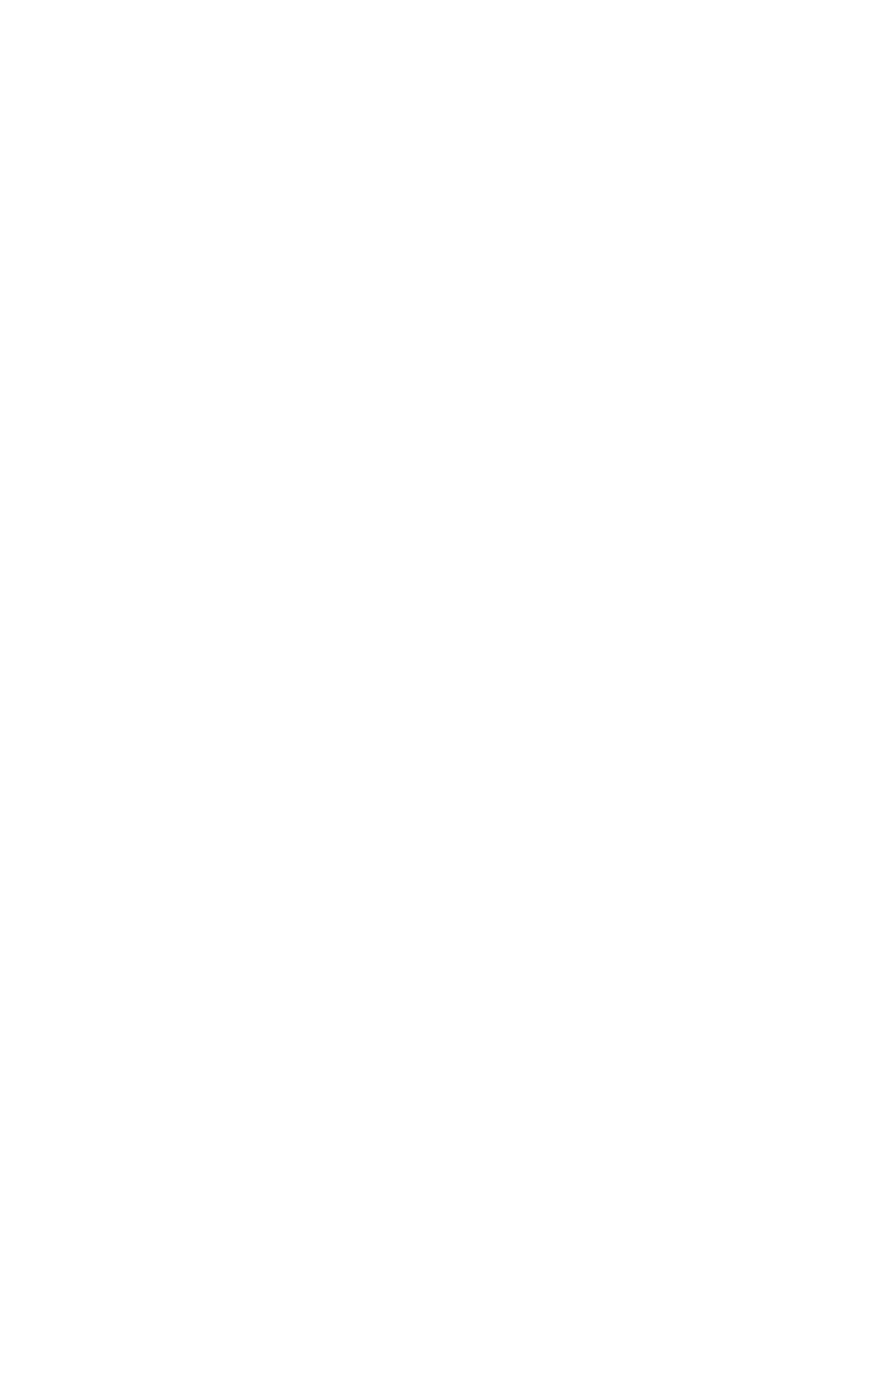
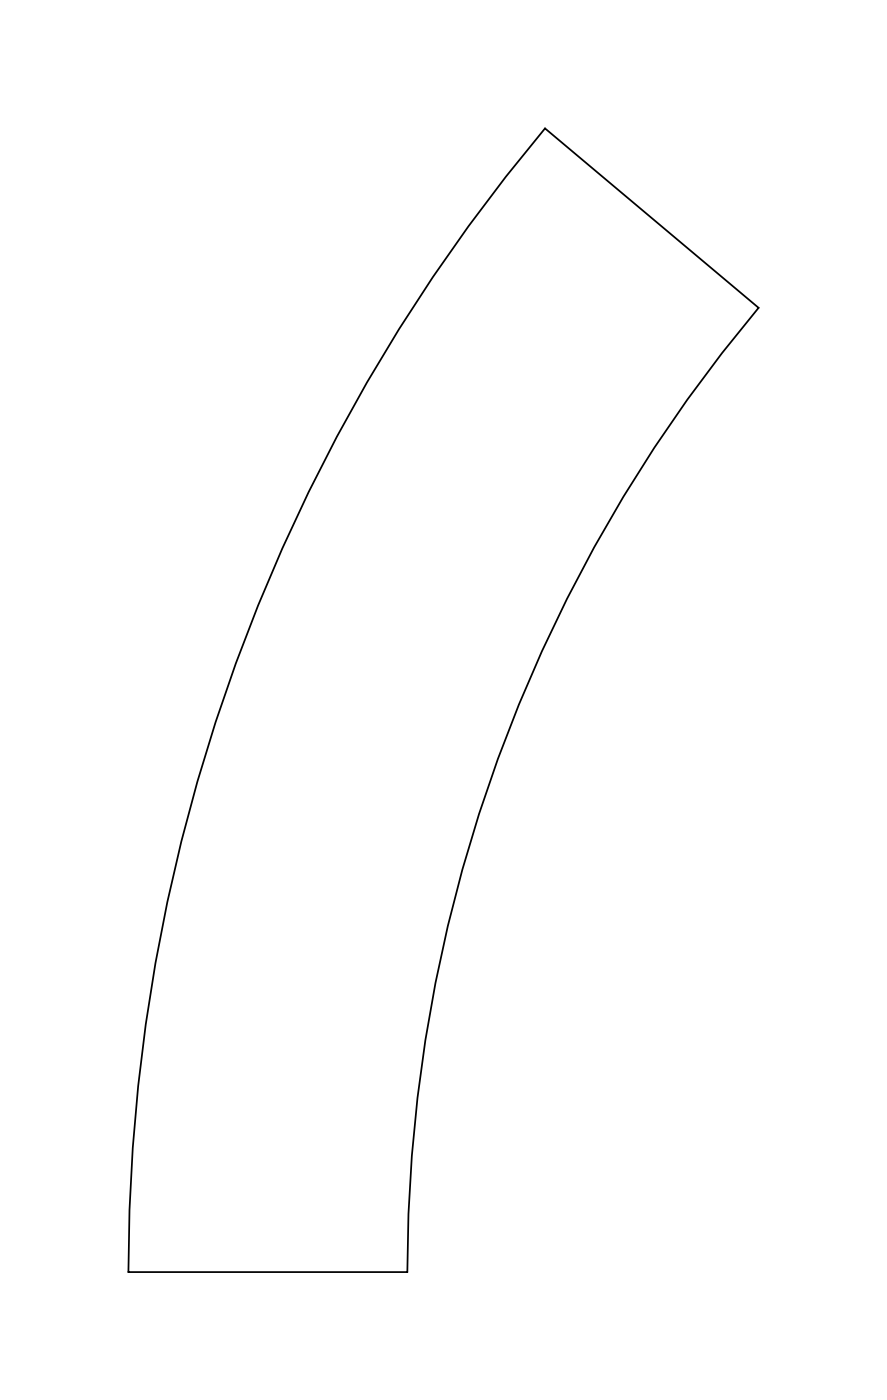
board edge: none -> (545, 128) (758, 307) (687, 399) (623, 496) (567, 598) (541, 651) (497, 758) (462, 869) (435, 982) (425, 1040) (411, 1155) (407, 1272) (128, 1272) (129, 1209) (138, 1086) (155, 963) (167, 902) (197, 781) (235, 663) (258, 605) (308, 492) (366, 382) (398, 329) (468, 226) (545, 128)

